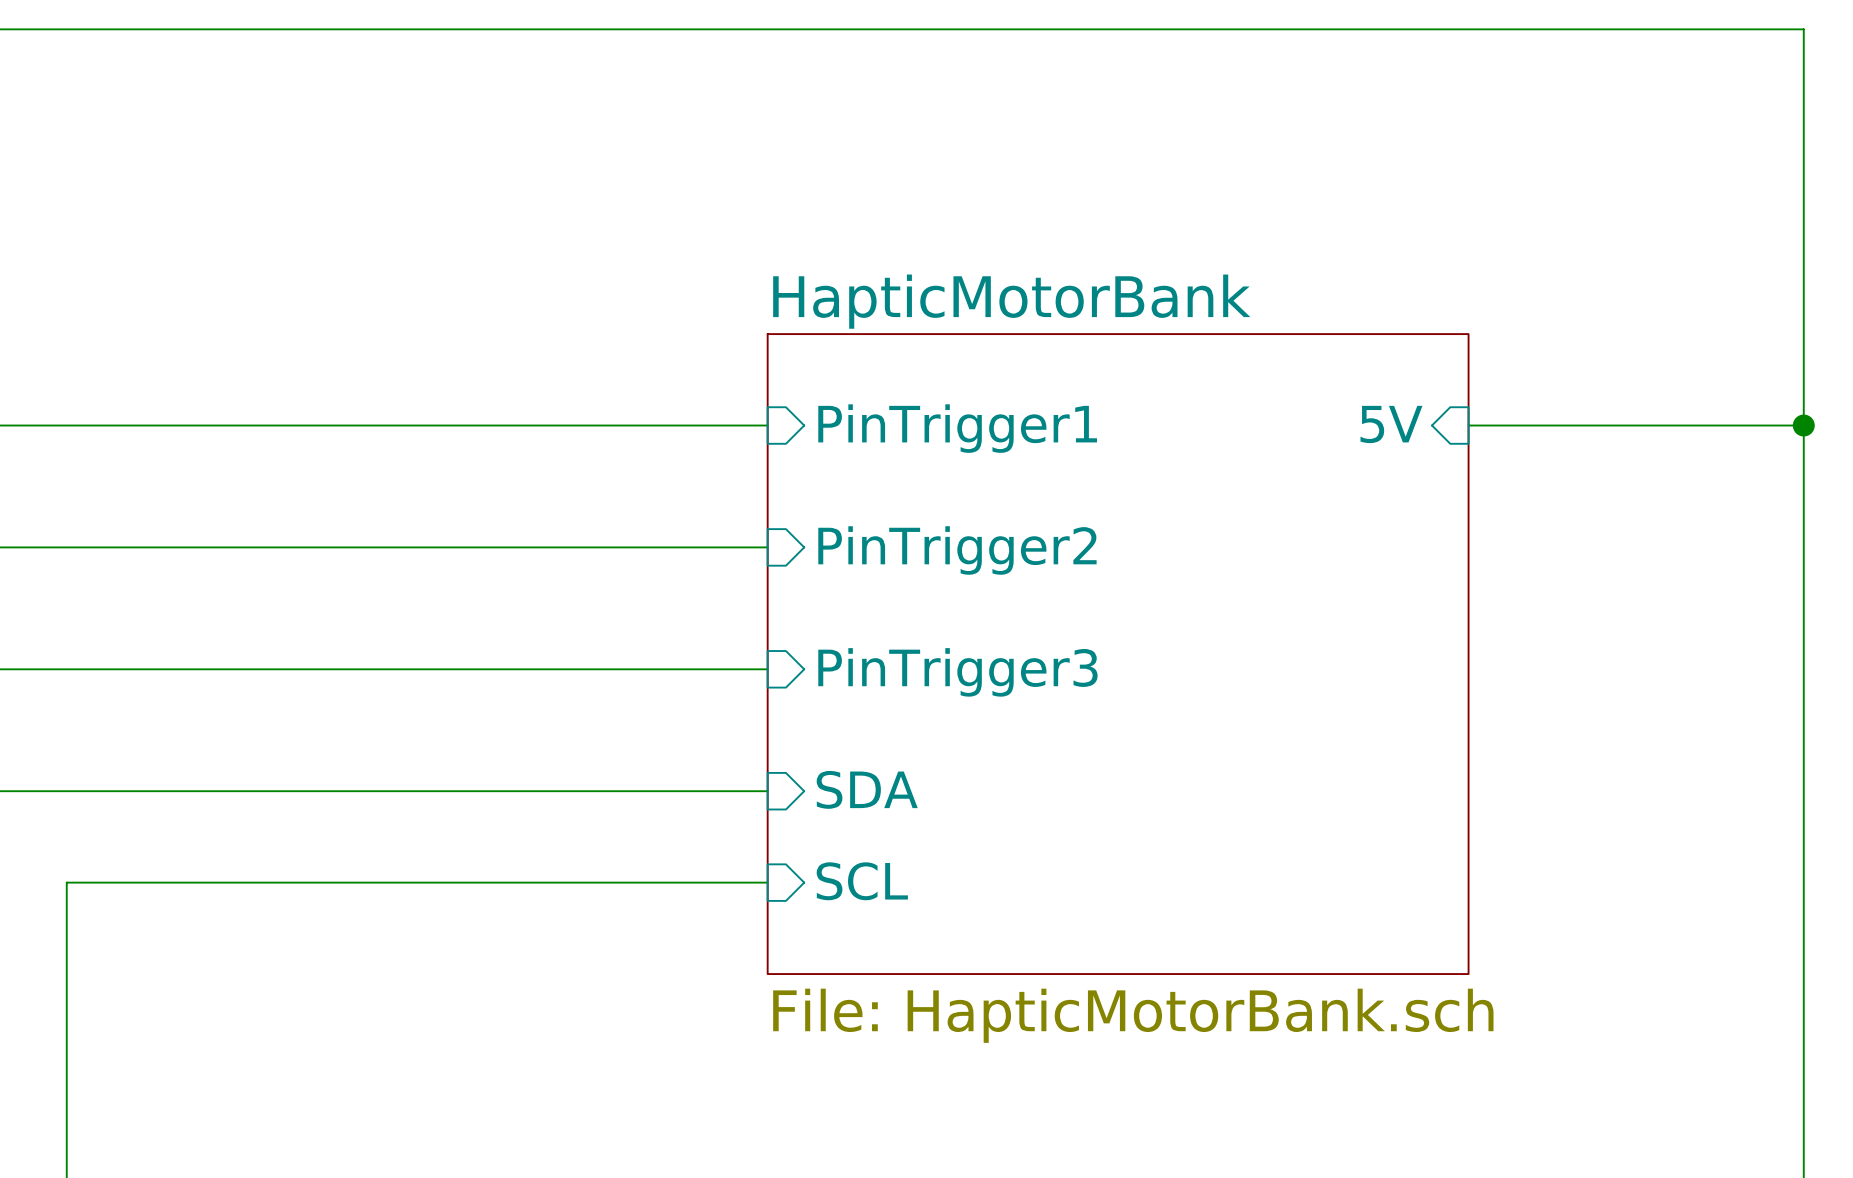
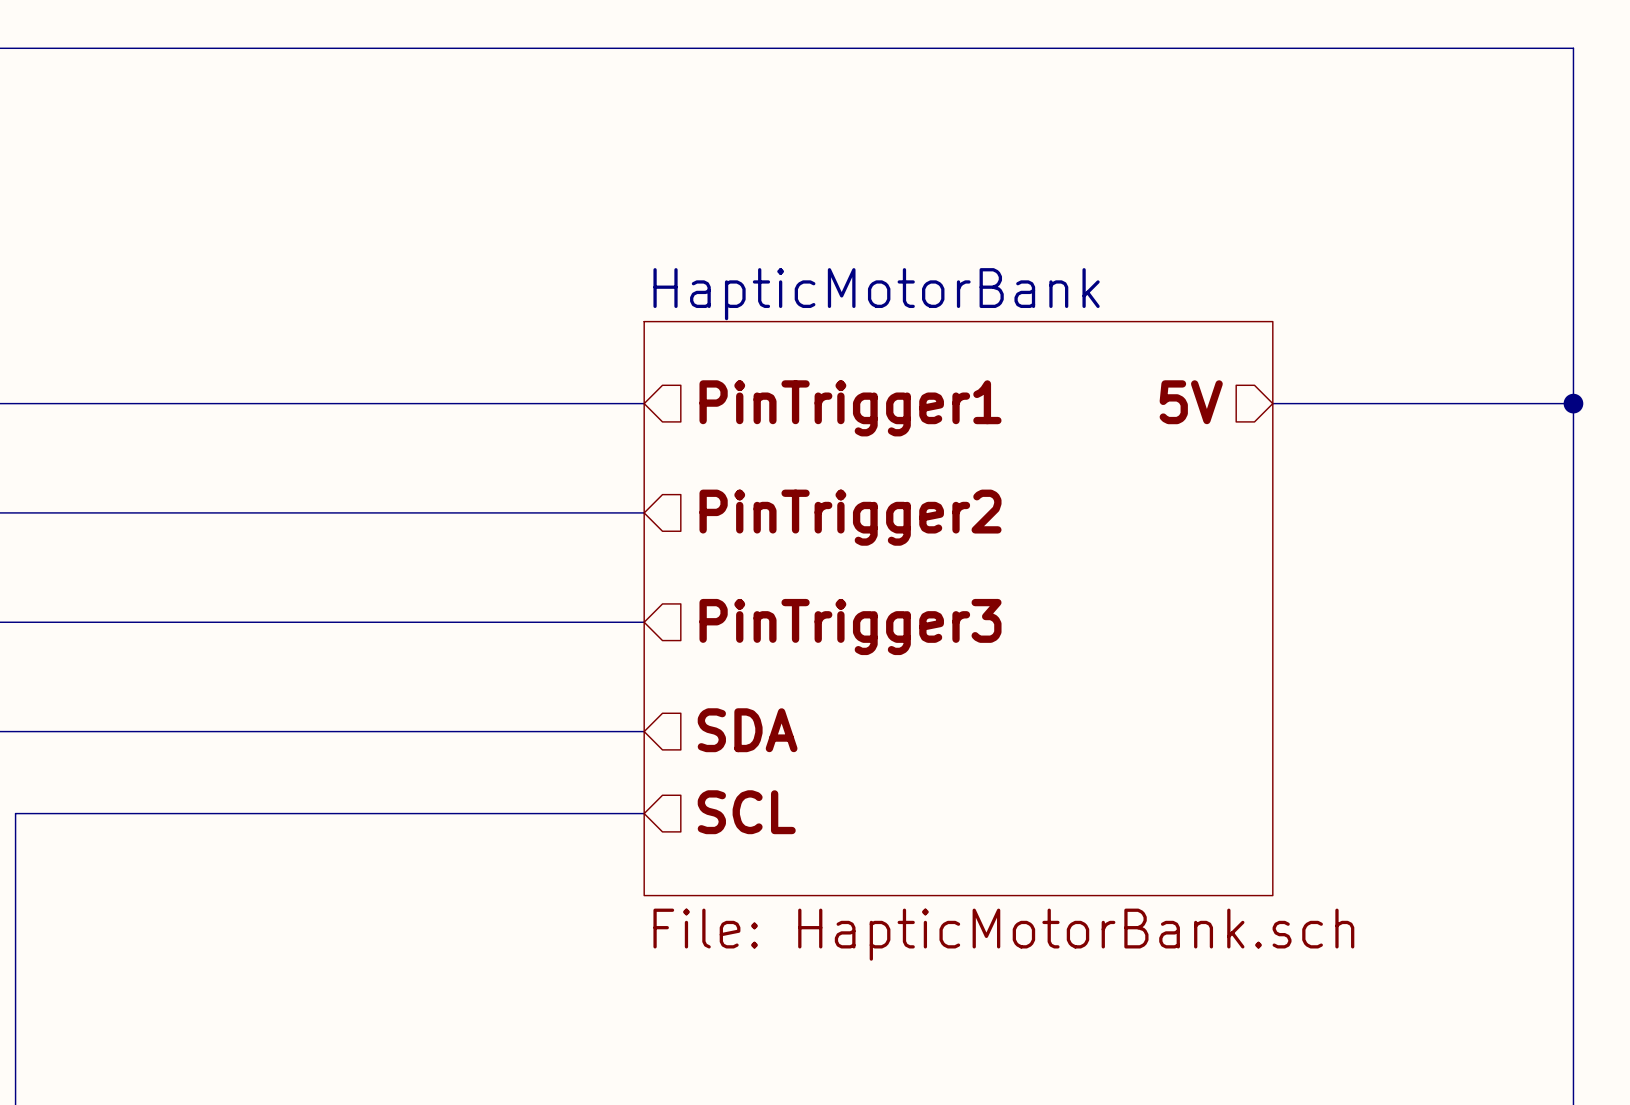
hierarchical label: none -> 5V (1191, 402)
sheet pin: 5V (1391, 424) -> none
sheet pin: PinTrigger1 (957, 428) -> none
hierarchical label: none -> PinTrigger1 (850, 408)
sheet pin: PinTrigger2 (957, 550) -> none
hierarchical label: none -> PinTrigger2 (850, 517)
sheet pin: PinTrigger3 (957, 672) -> none
hierarchical label: none -> PinTrigger3 (850, 626)
sheet pin: SDA (867, 789) -> none
hierarchical label: none -> SDA (747, 730)
sheet pin: SCL (862, 881) -> none
hierarchical label: none -> SCL (746, 812)

